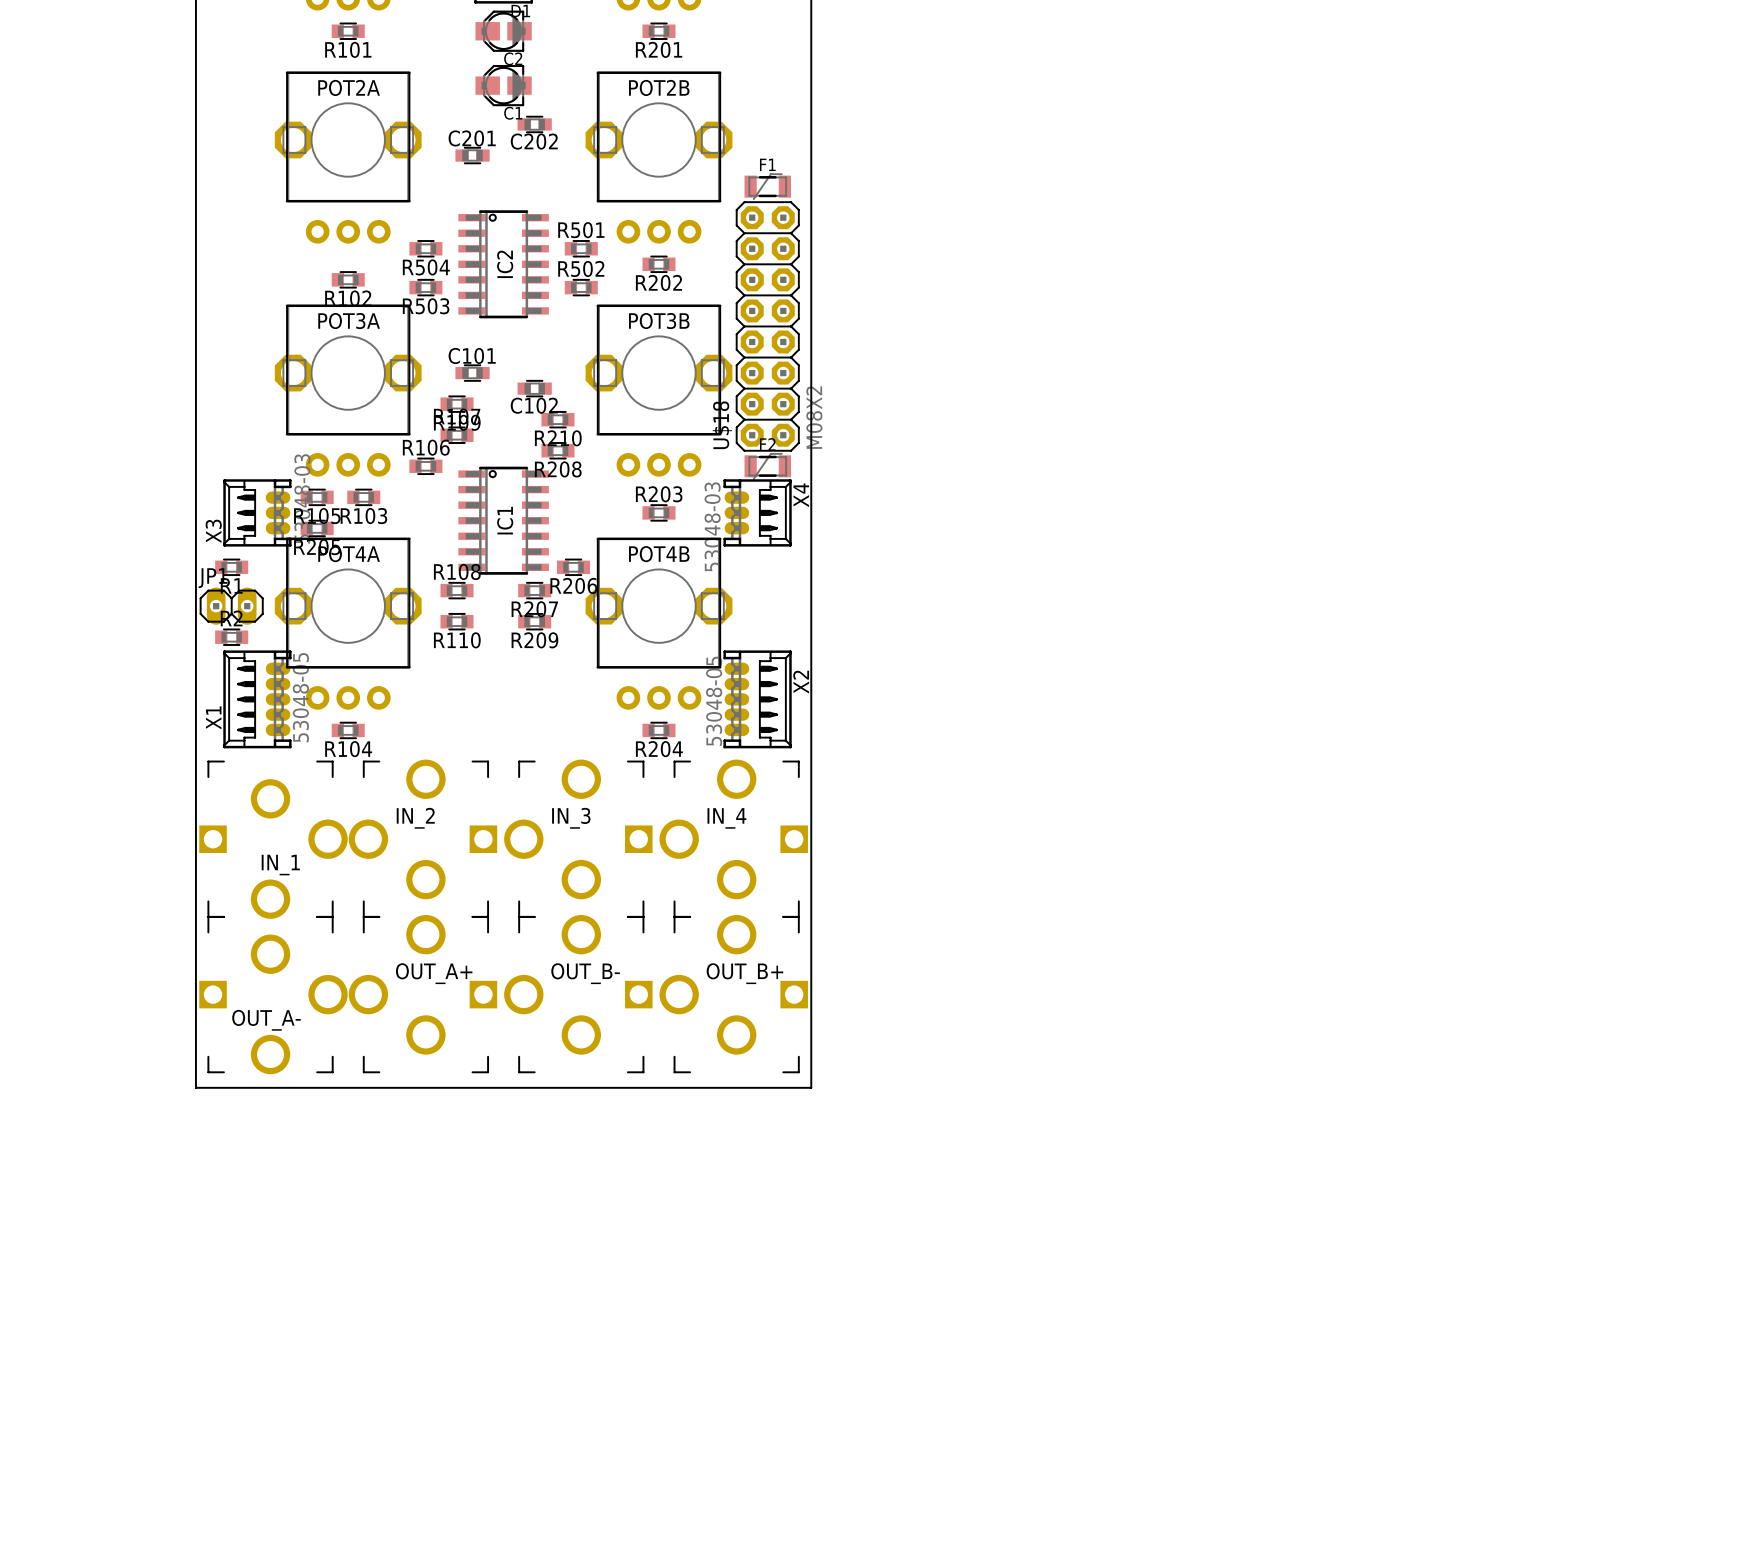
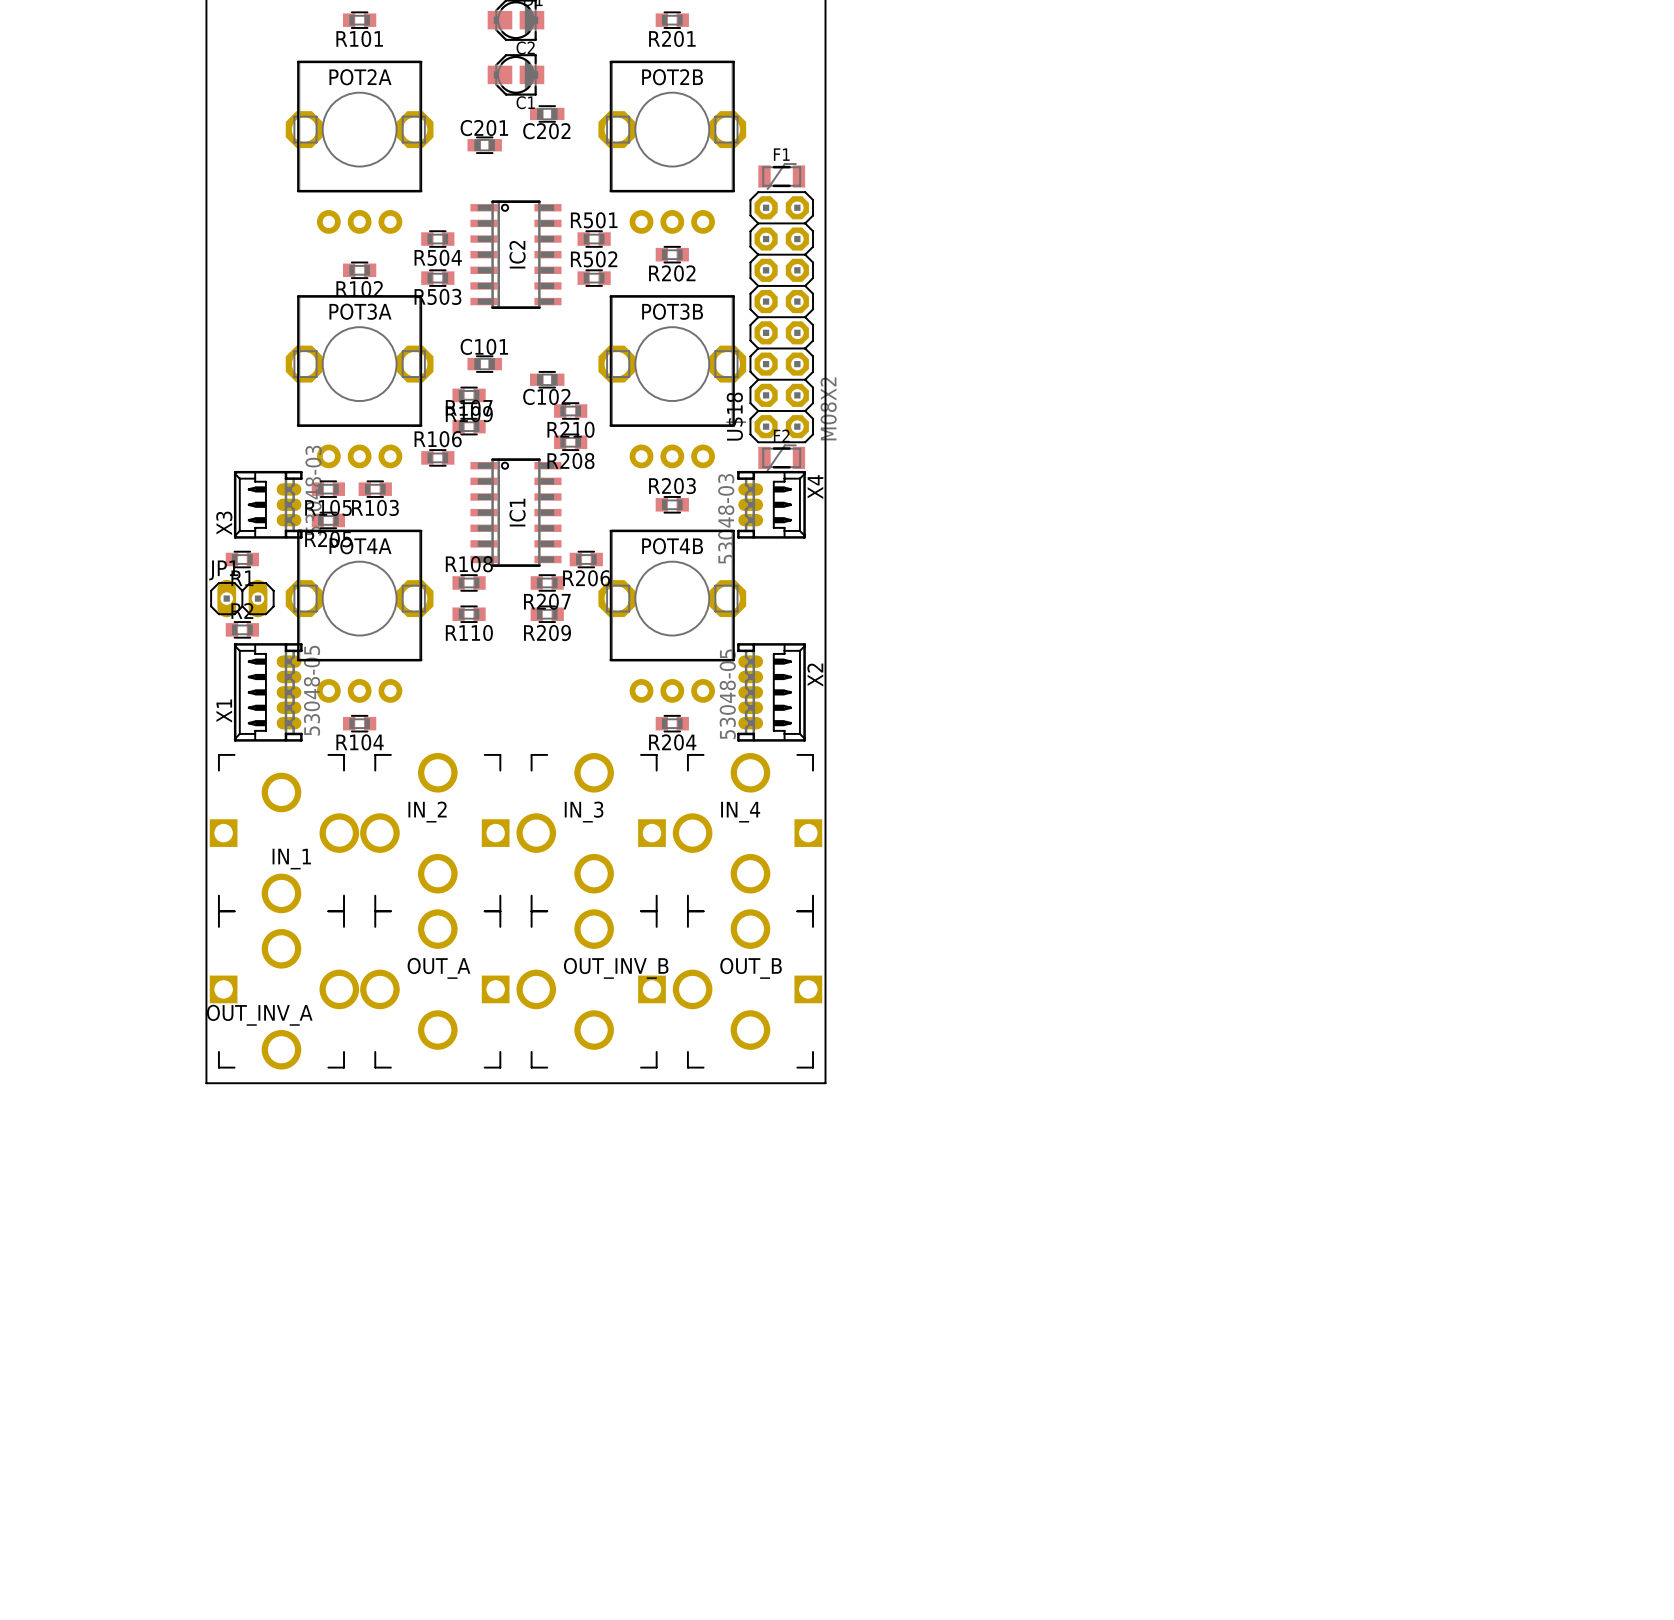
OUT_A+ name: OUT_A+ (434, 973) -> OUT_A (438, 968)
OUT_B- name: OUT_B- (585, 973) -> OUT_INV_B (616, 968)
OUT_B+ name: OUT_B+ (744, 973) -> OUT_B (751, 968)
OUT_A- name: OUT_A- (266, 1020) -> OUT_INV_A (259, 1015)

